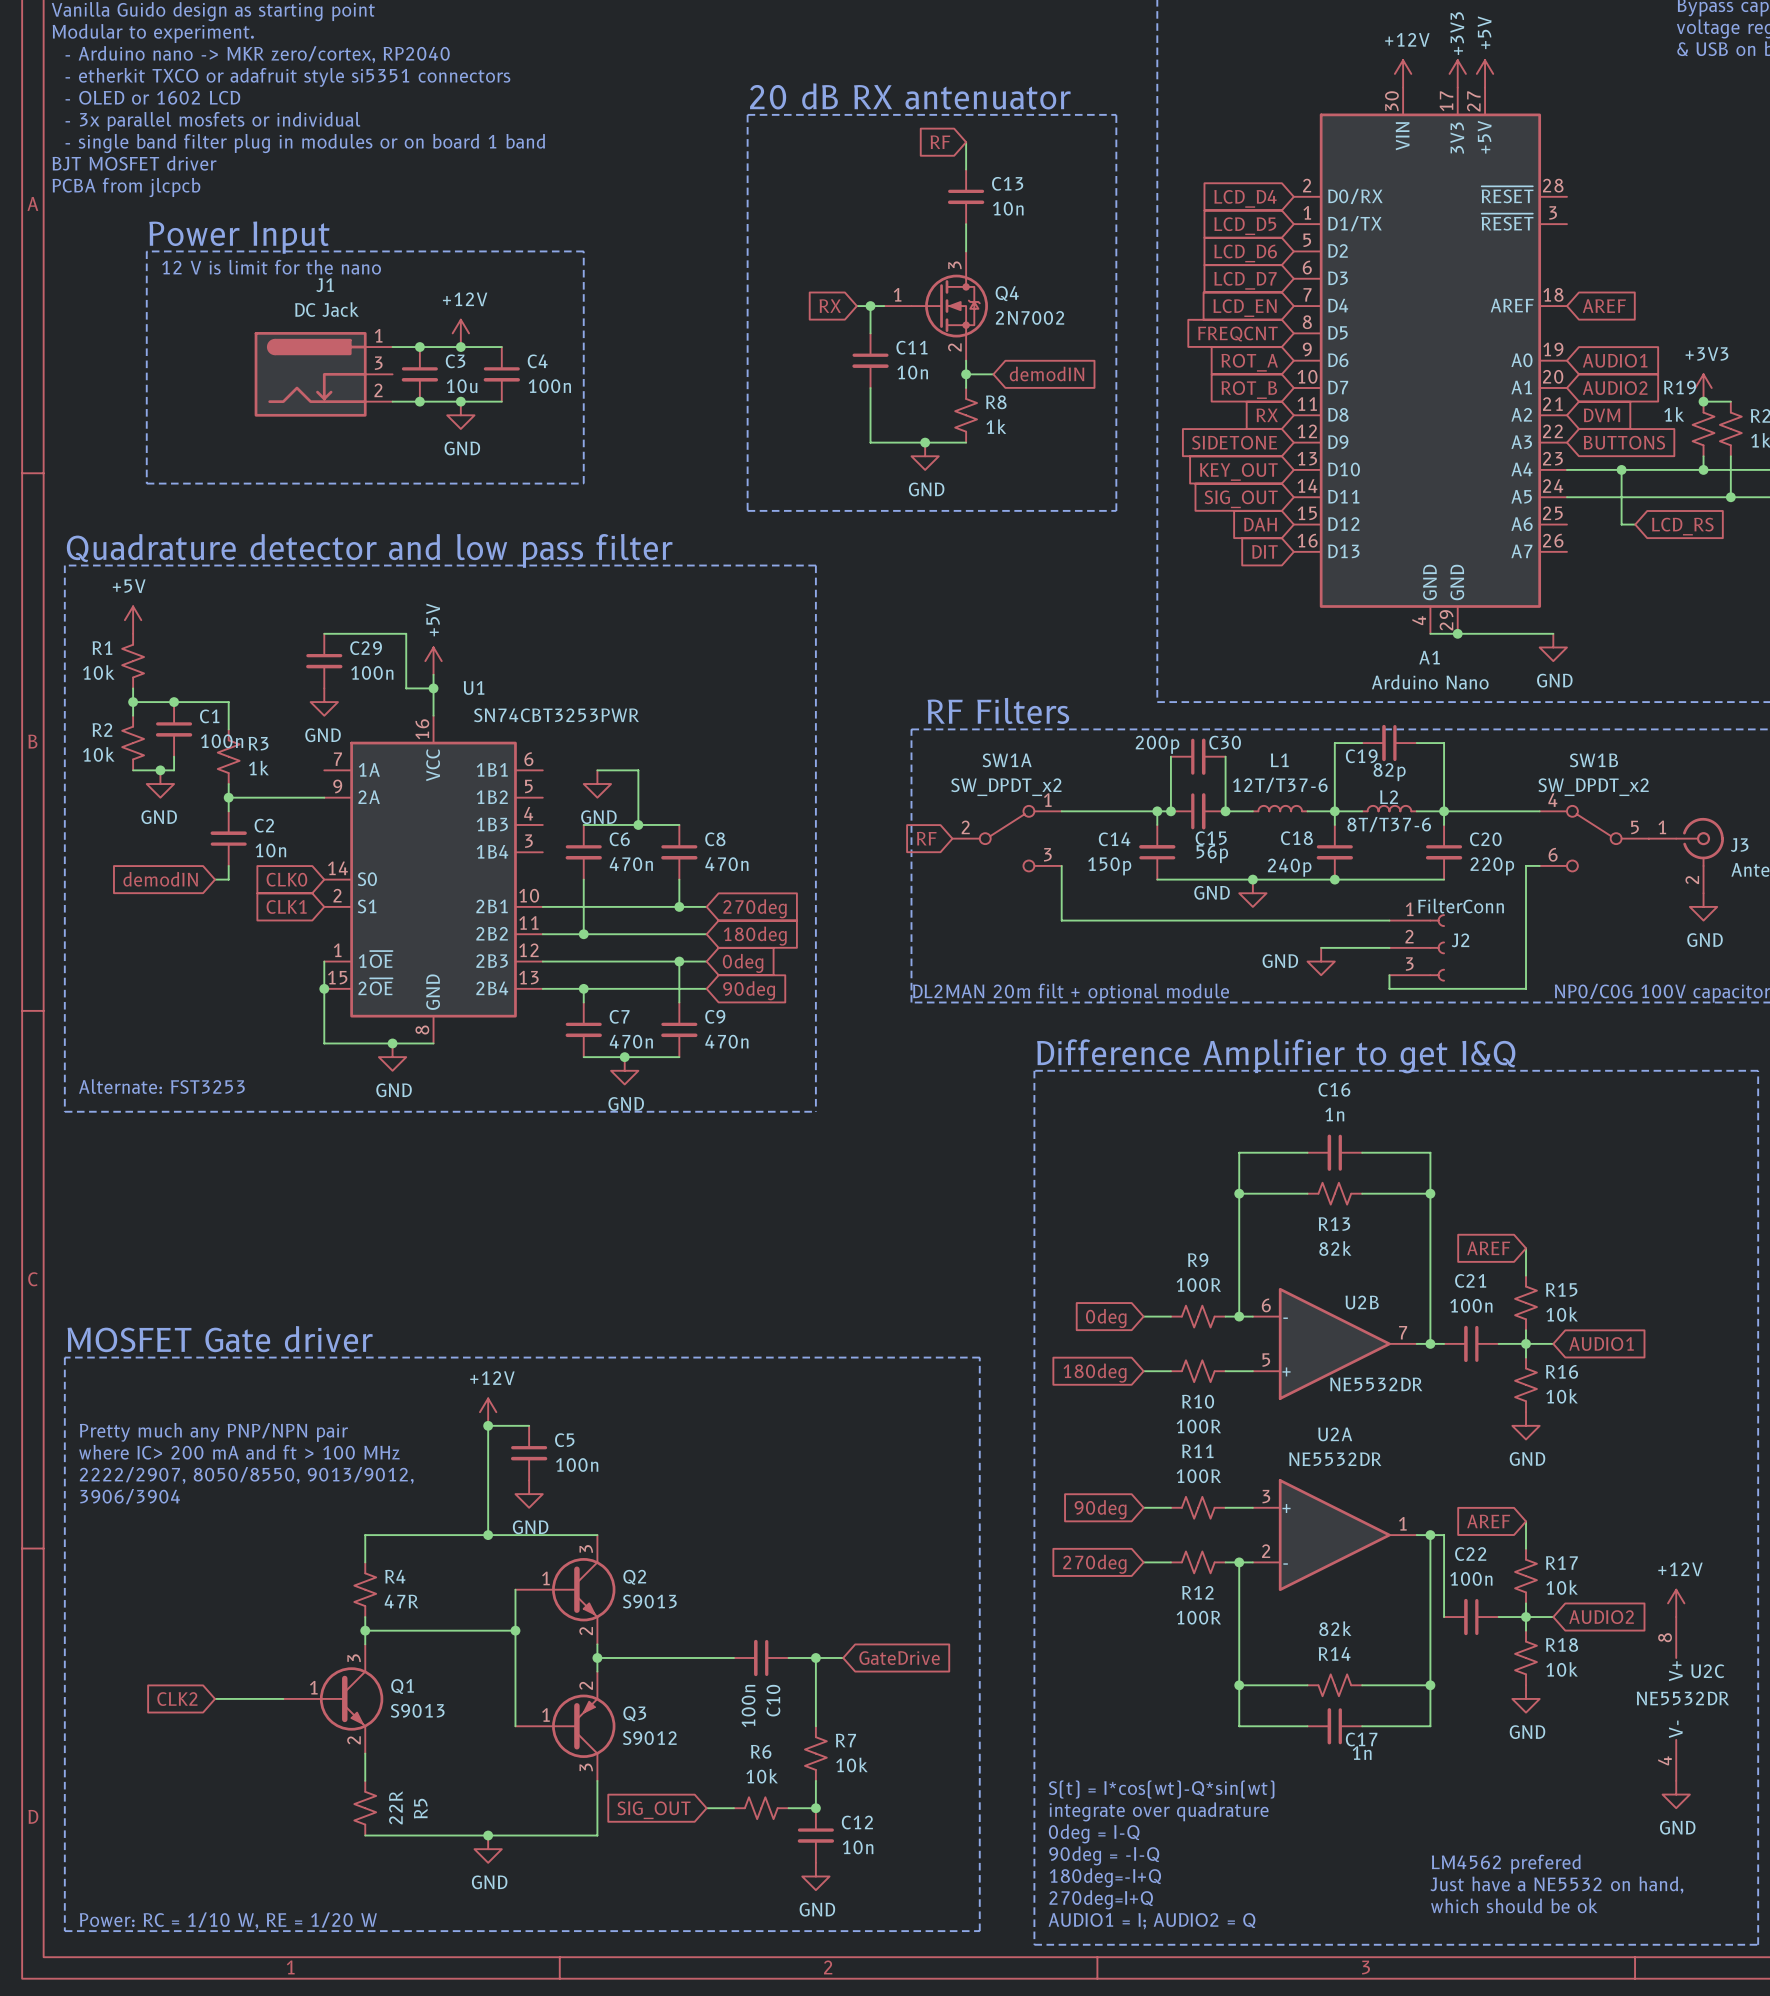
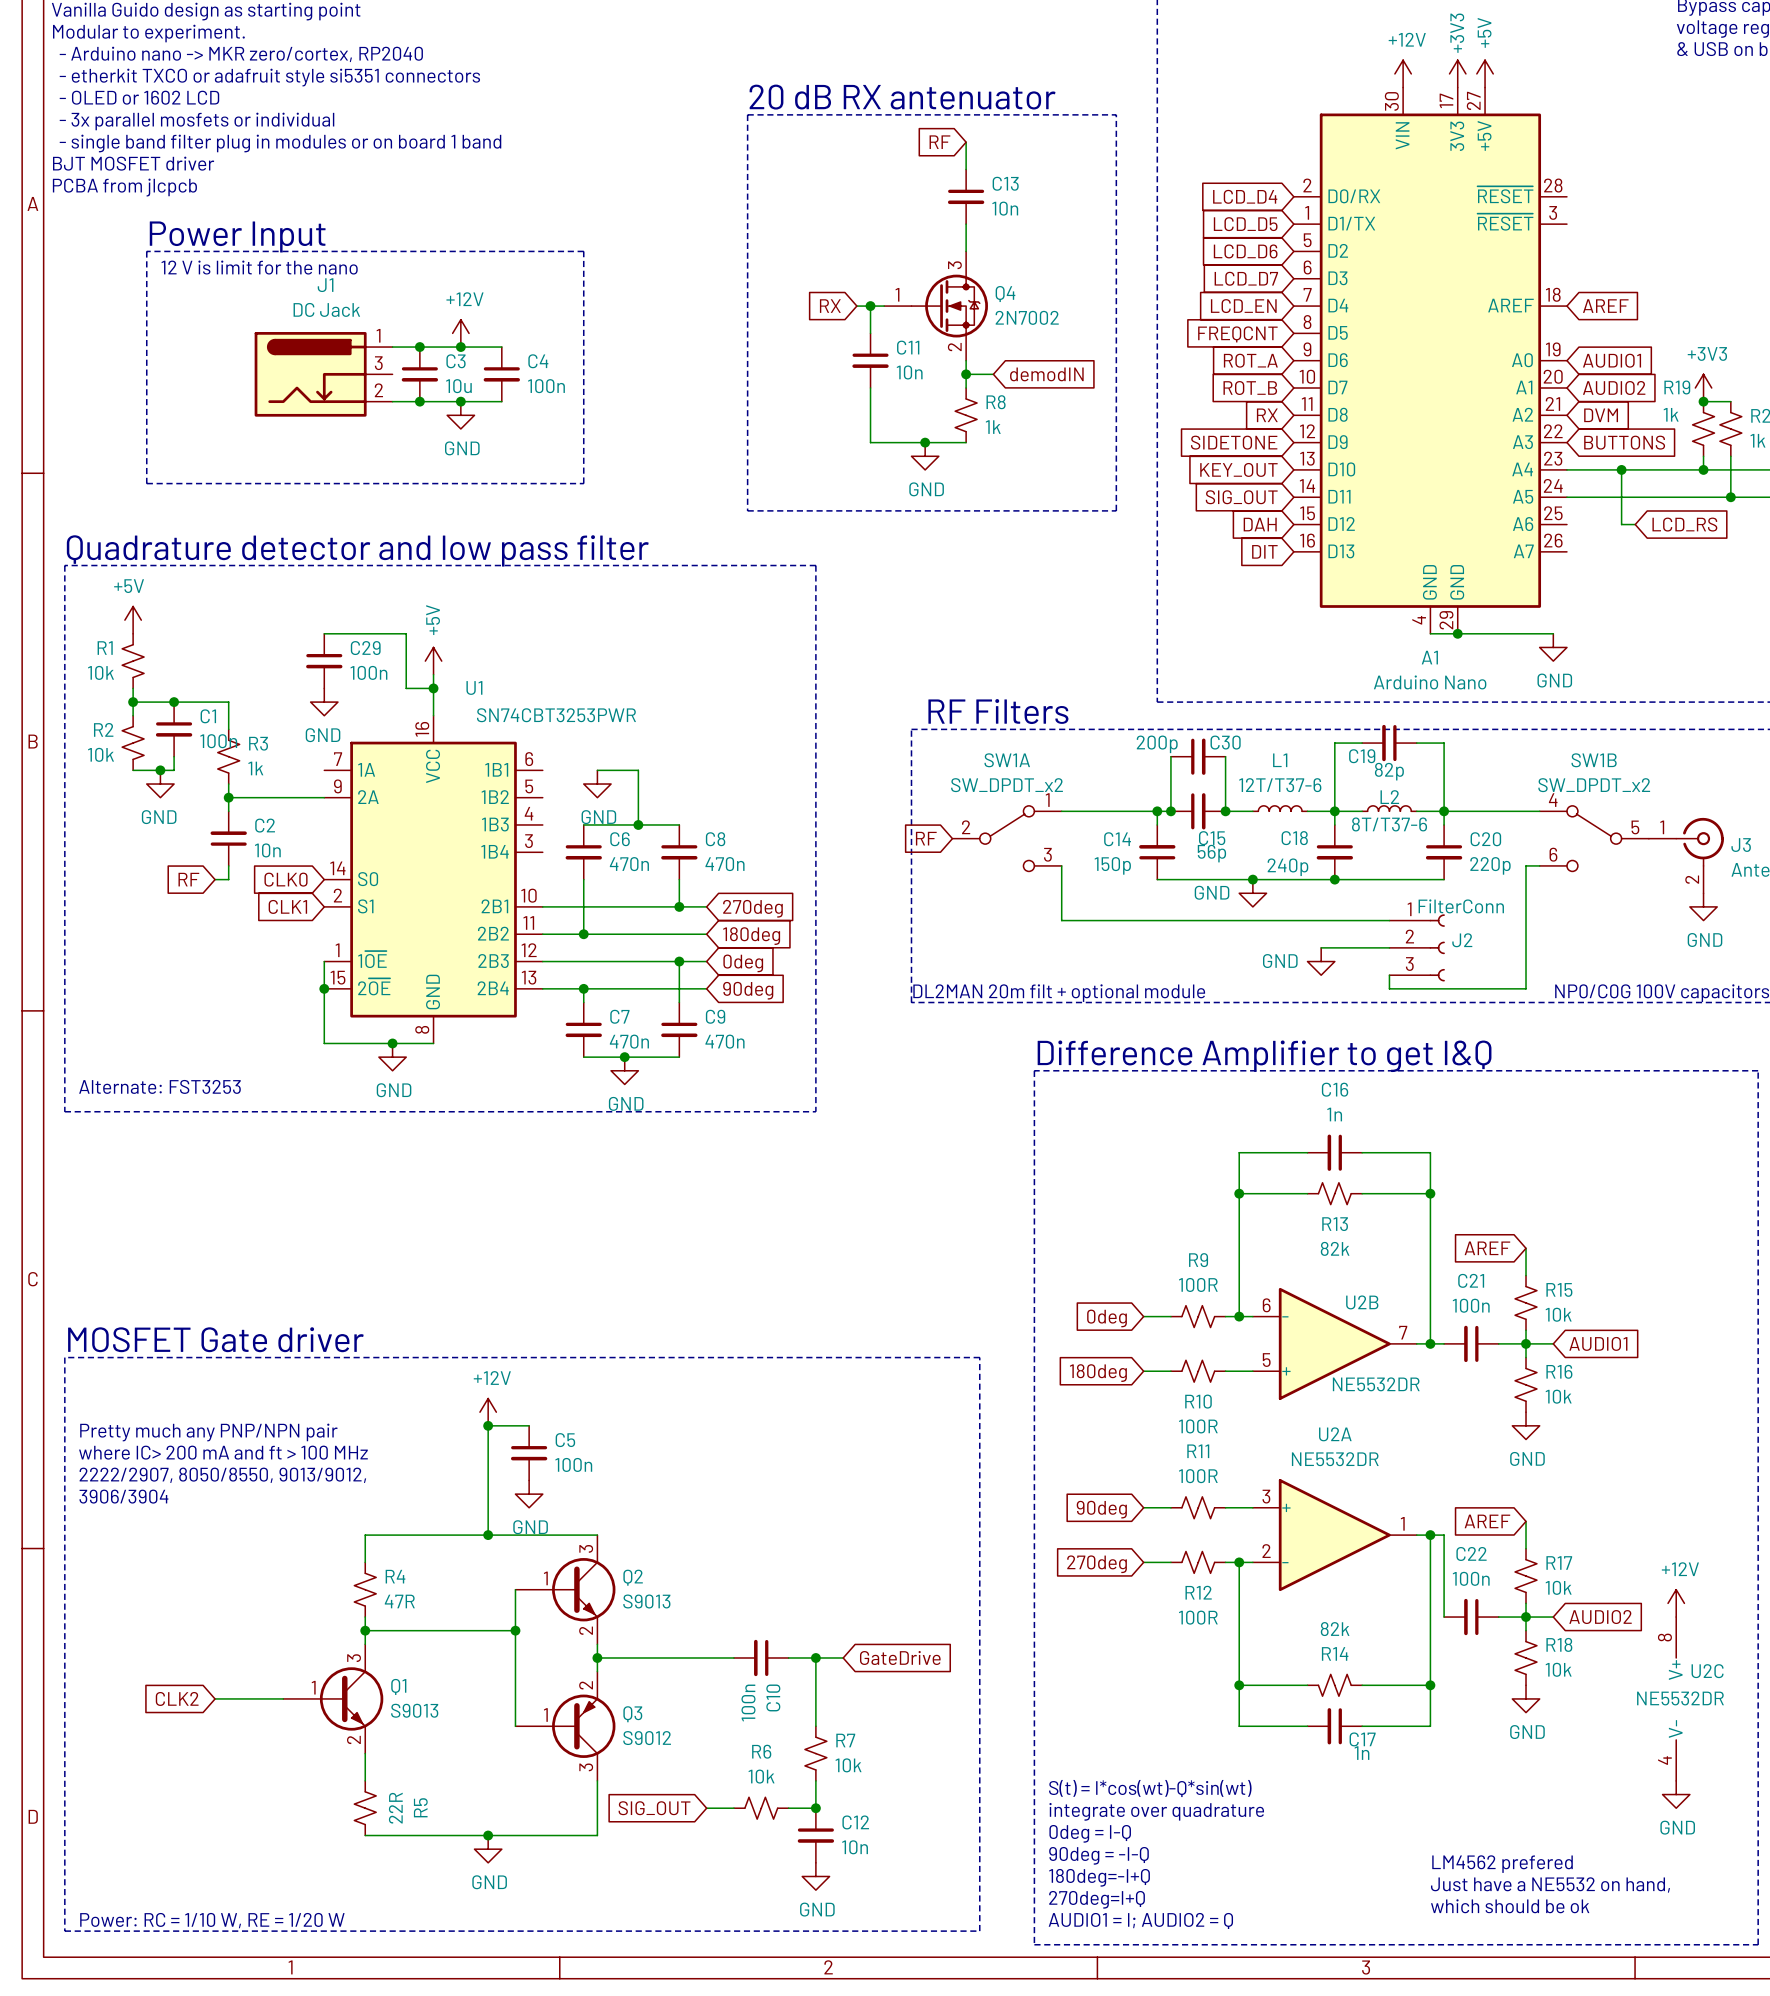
global label: demodIN (160, 879) -> RF (188, 879)

